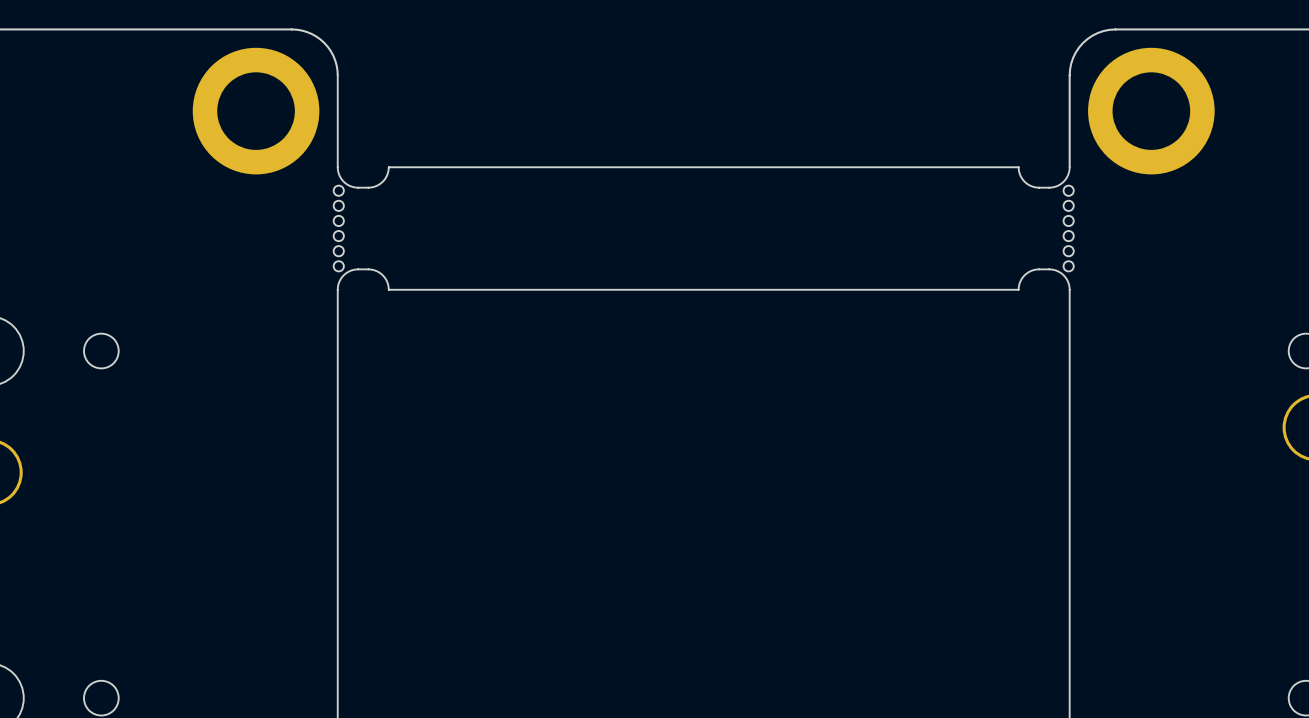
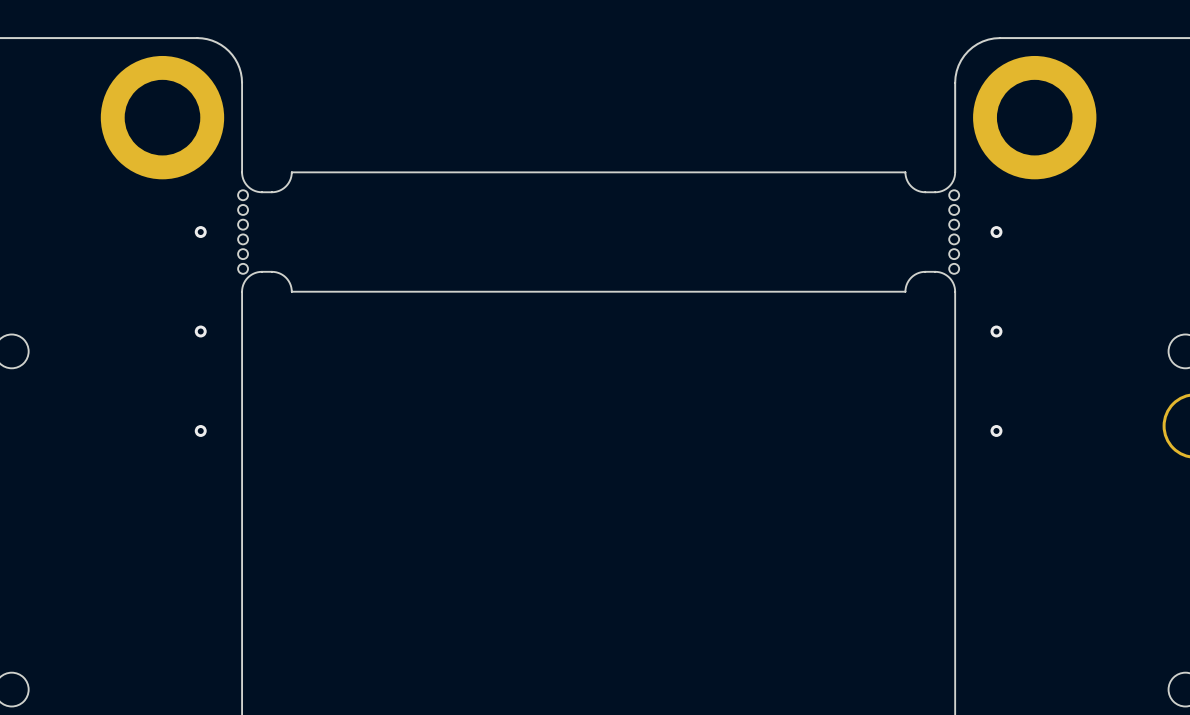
via: none -> (200, 232)
via: none -> (996, 232)
via: none -> (200, 331)
via: none -> (996, 331)
via: none -> (200, 430)
via: none -> (996, 430)

